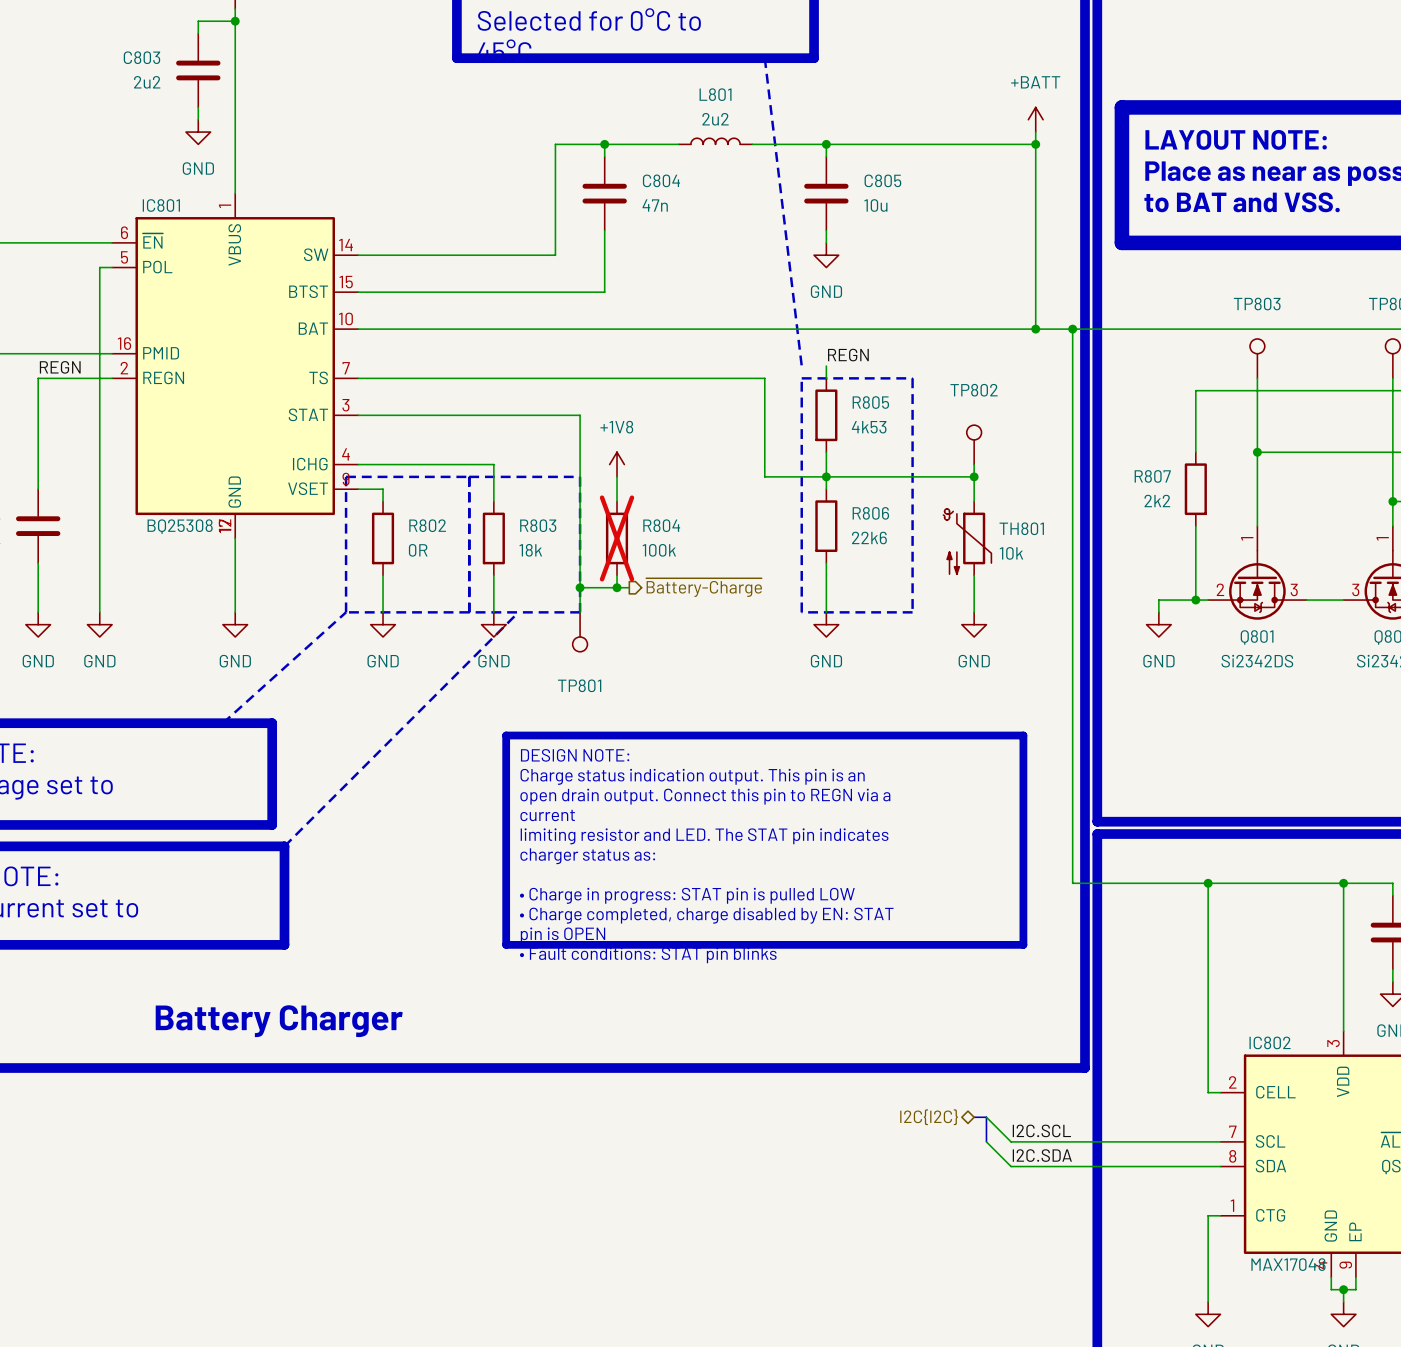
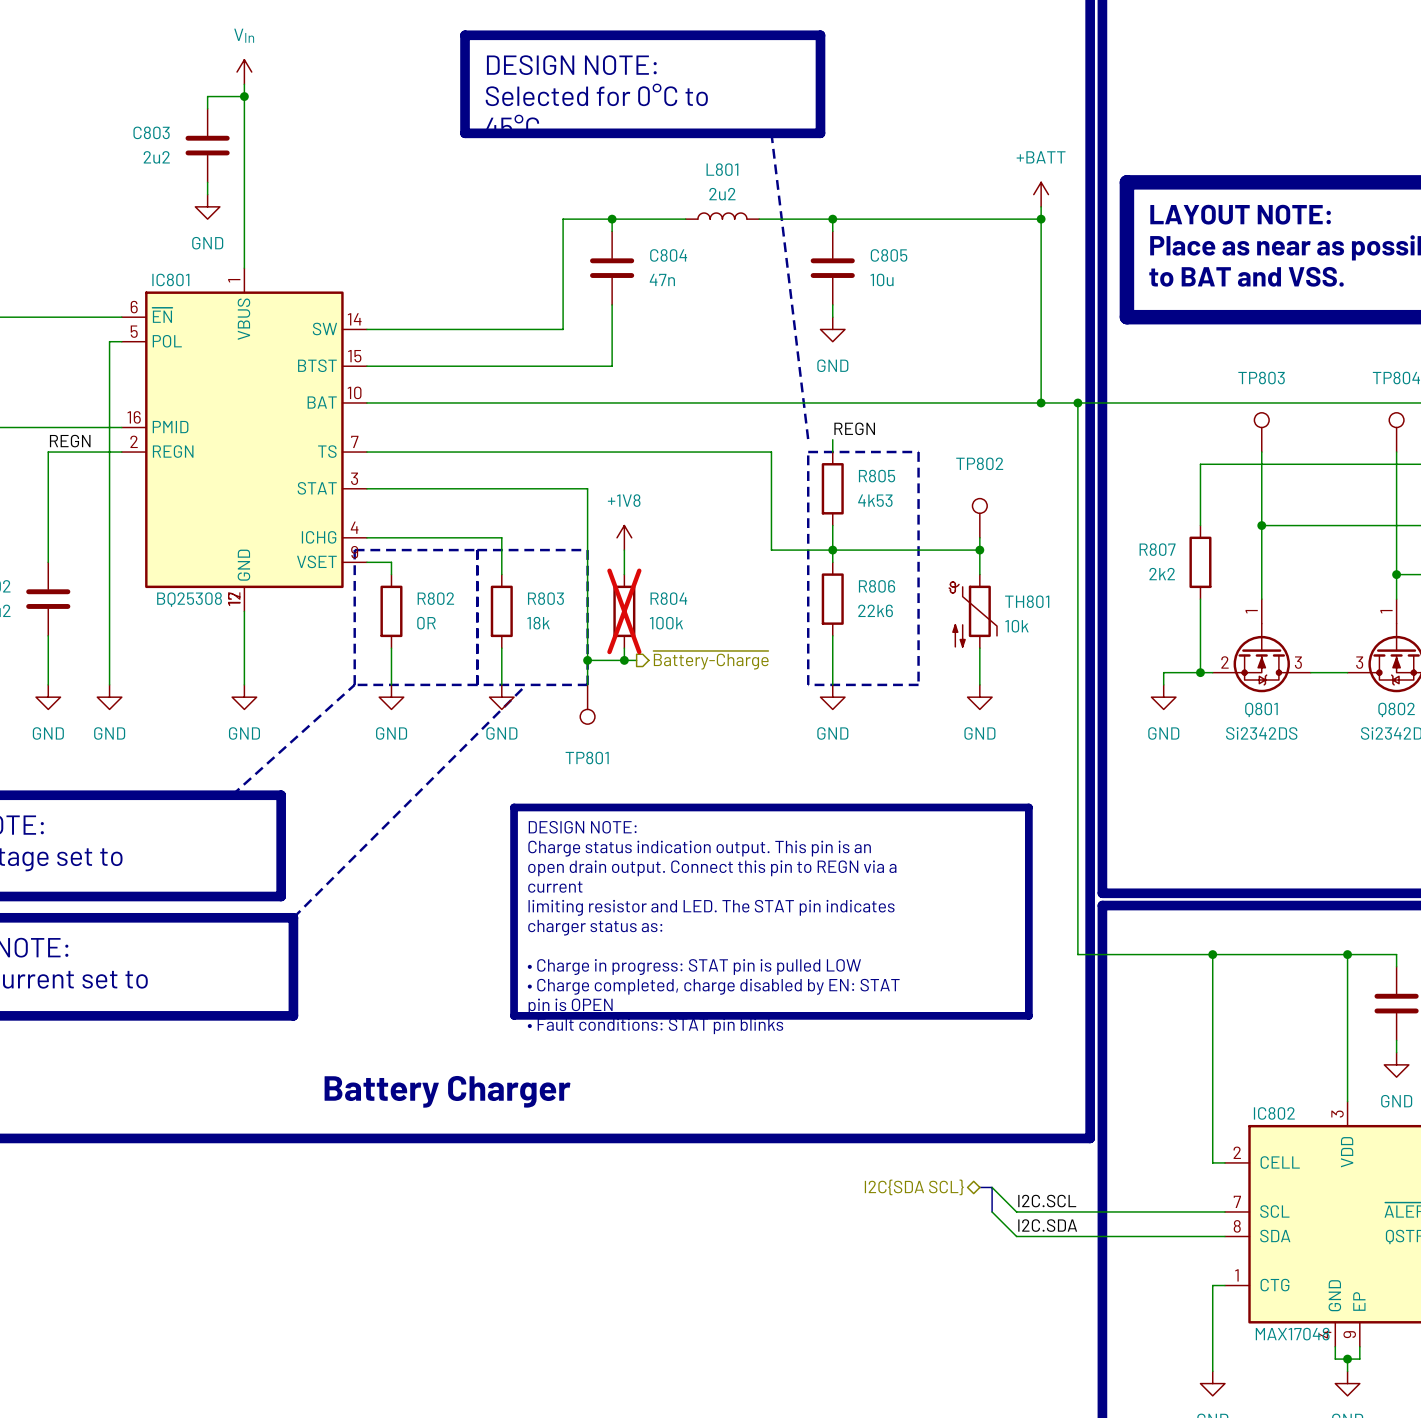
text position: Battery Charger (279, 1021) -> Battery Charger (447, 1091)
hierarchical label: I2C{I2C} (929, 1117) -> I2C{SDA SCL} (914, 1187)

